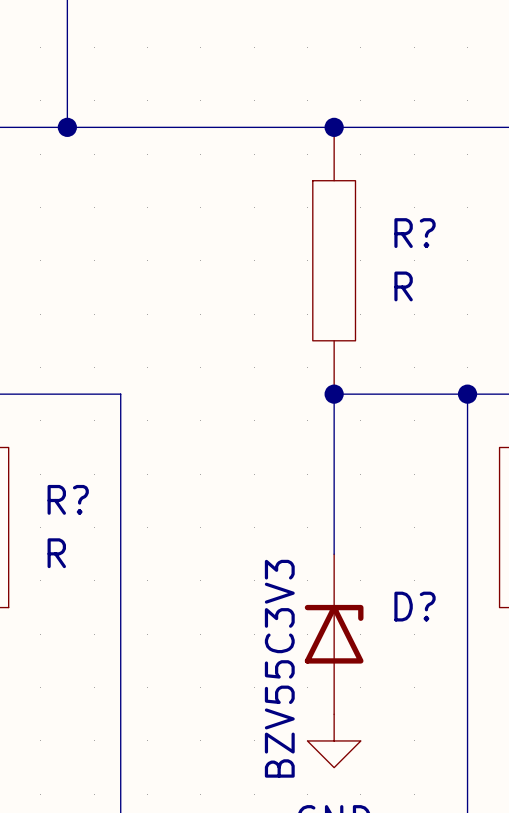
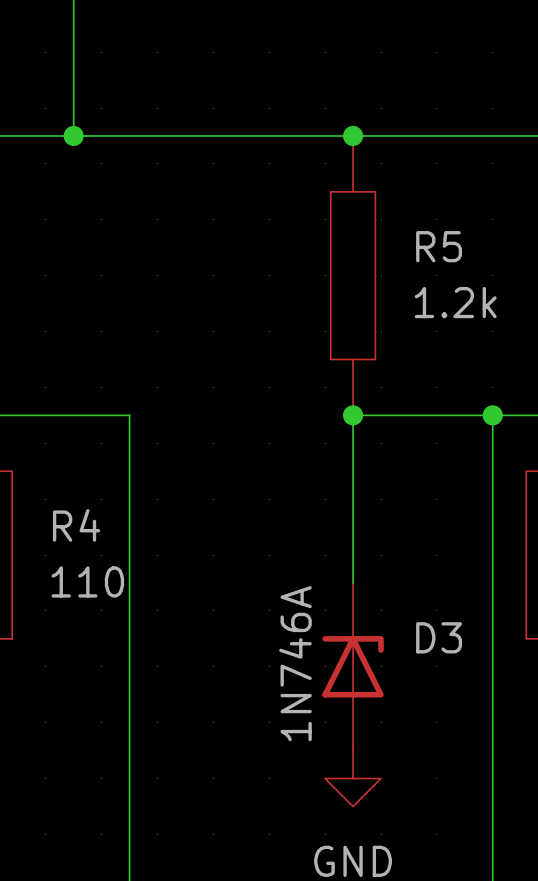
R? name: R? (415, 233) -> R5 (439, 246)
R? value: R (403, 286) -> 1.2k (455, 302)
R? name: R? (68, 499) -> R4 (76, 525)
R? value: R (56, 553) -> 110 (87, 581)
D? name: D? (415, 606) -> D3 (439, 637)
D? value: BZV55C3V3 (279, 668) -> 1N746A (295, 663)

